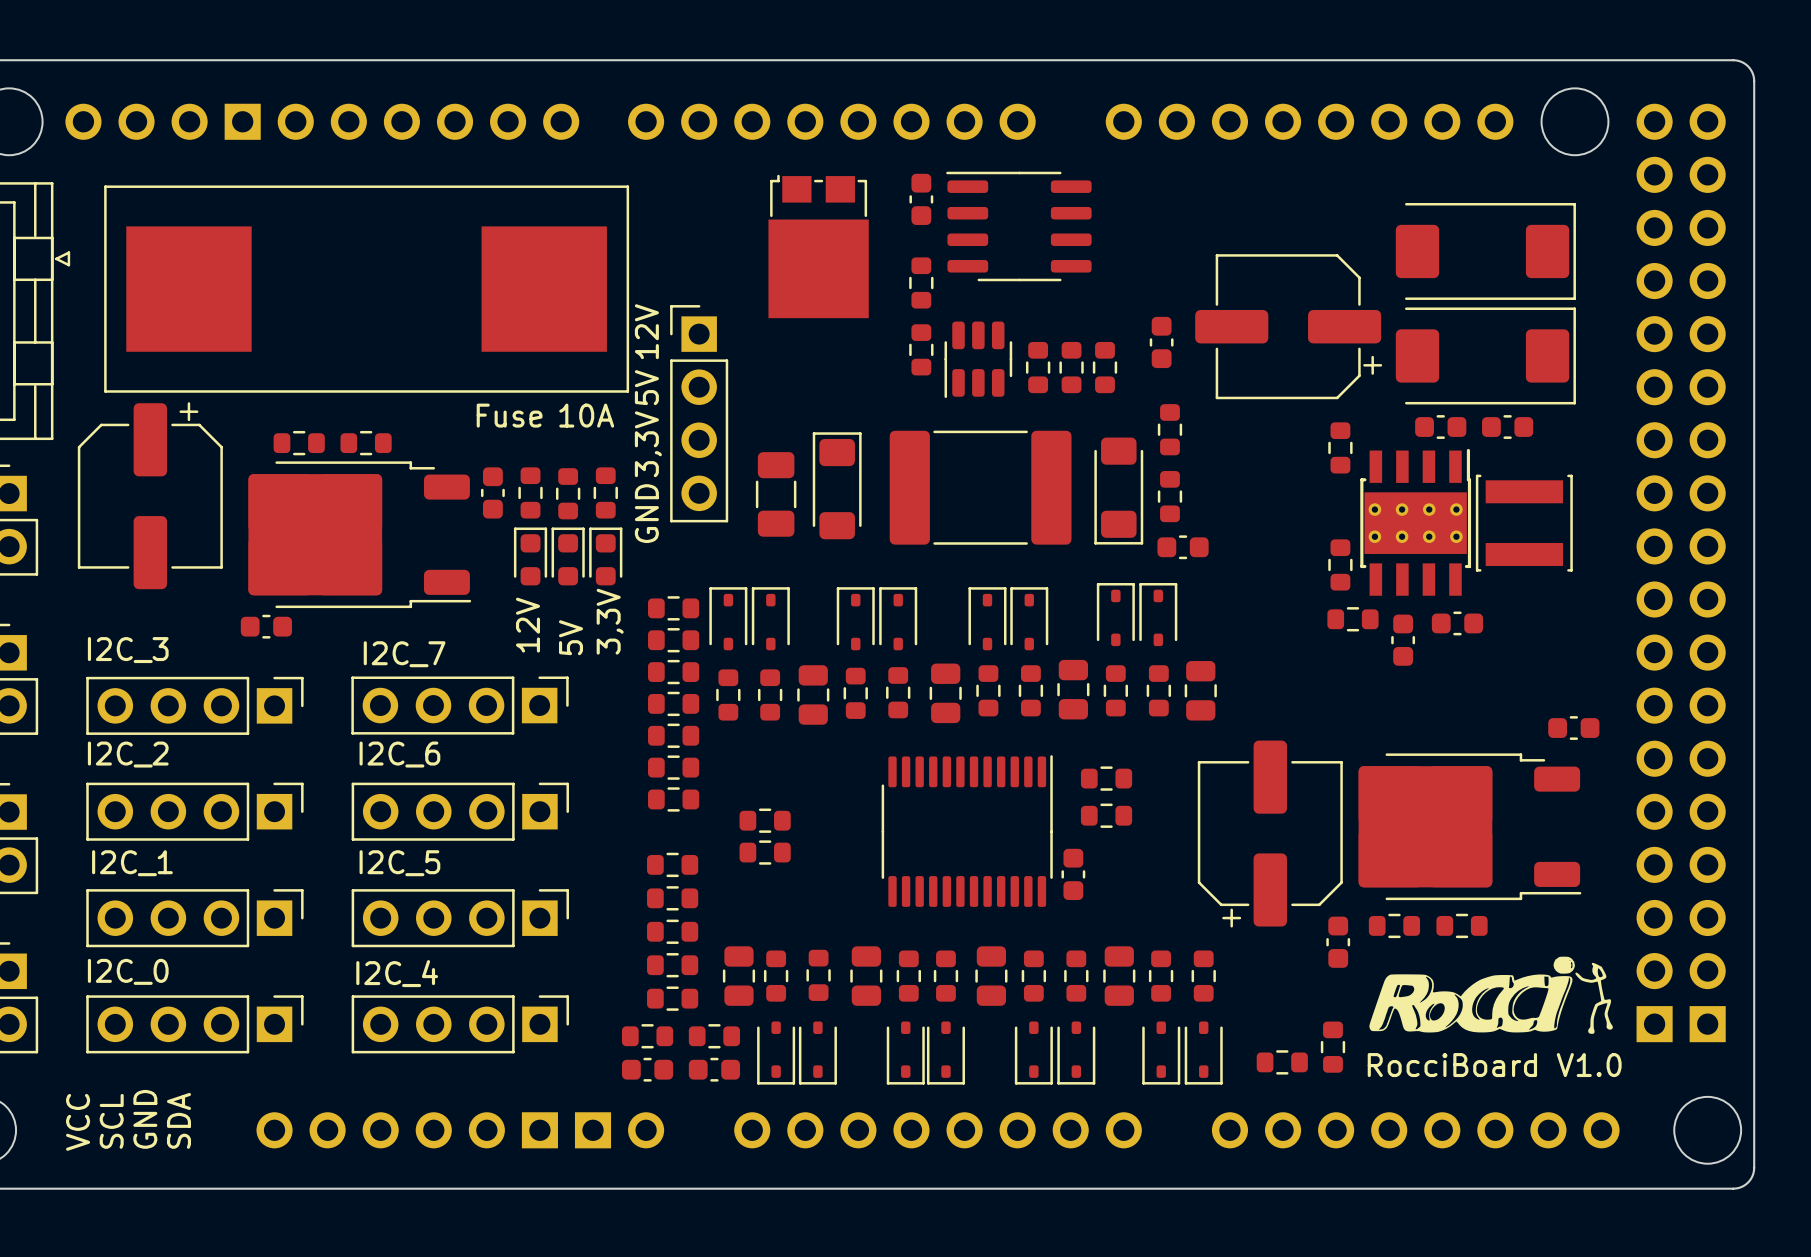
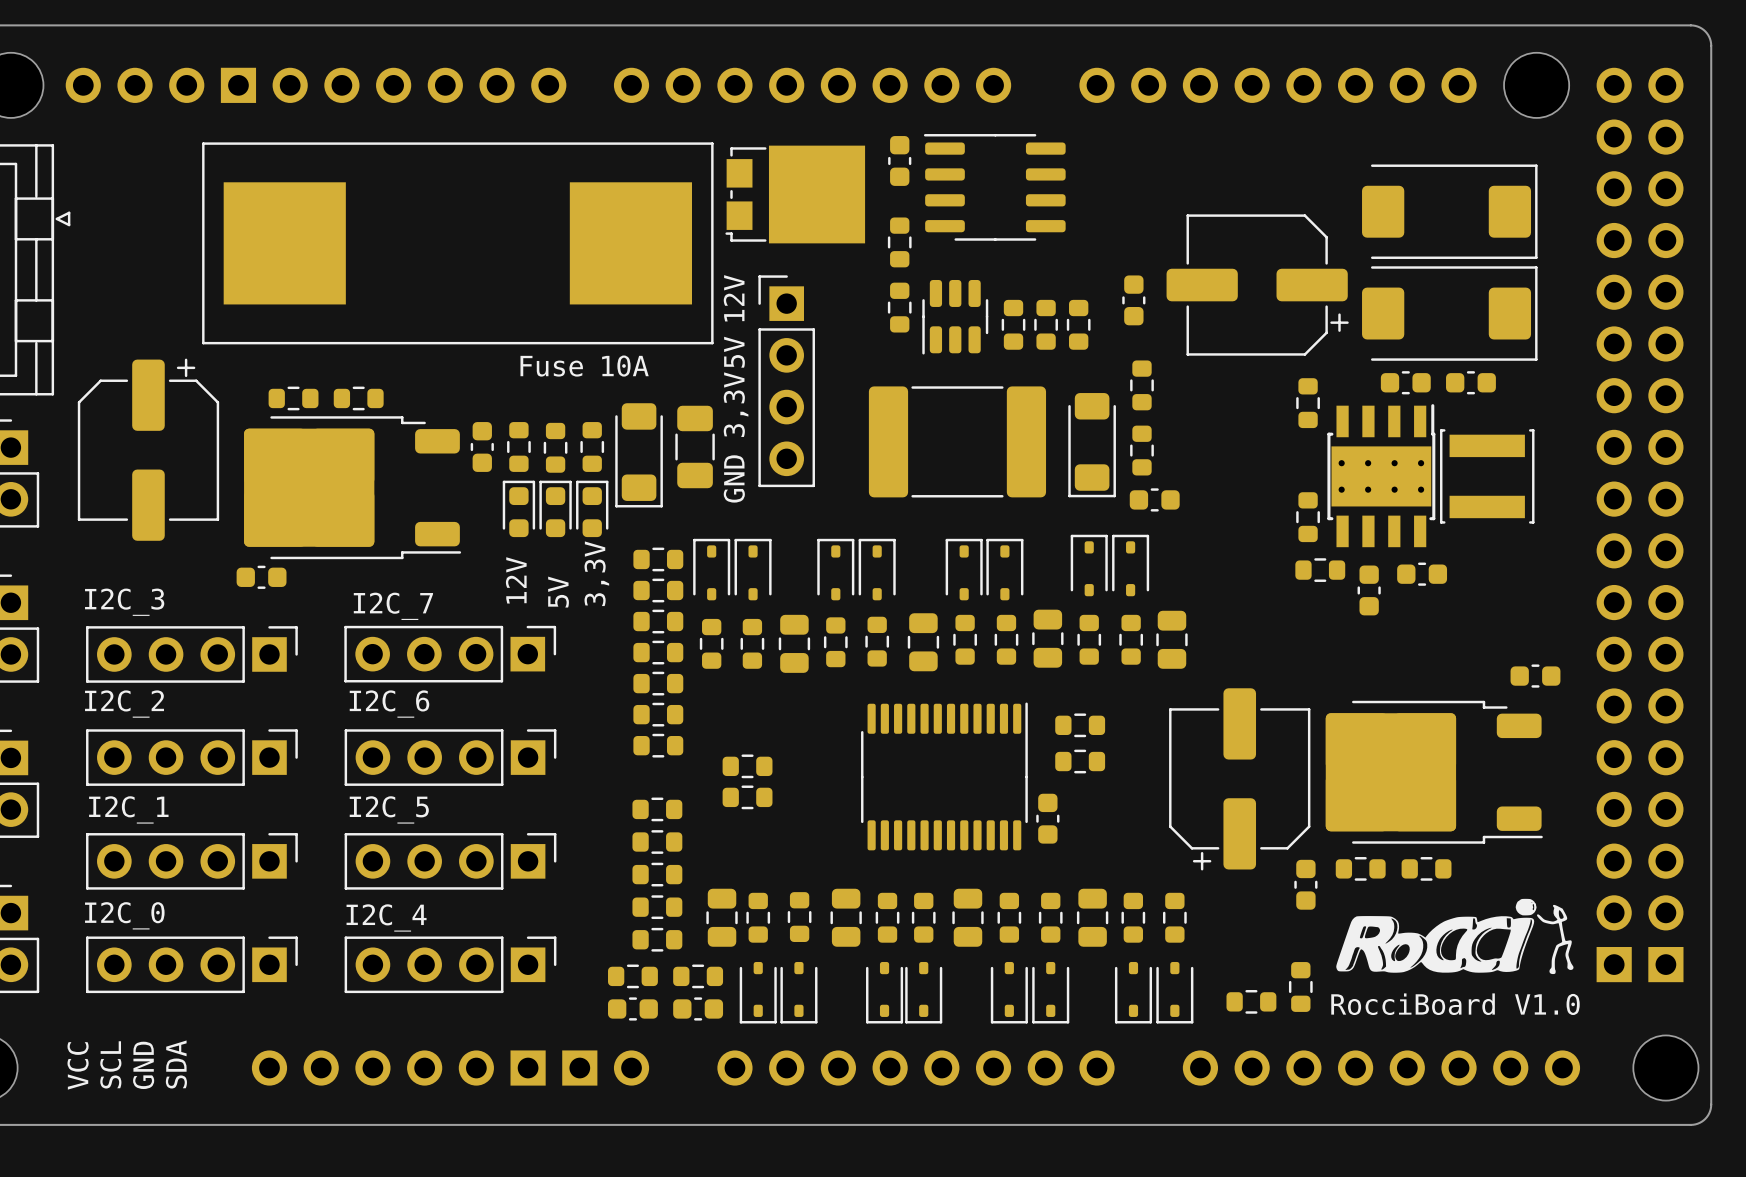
part rotation: 0° (818, 246) -> 90° counterclockwise (795, 194)
part position: (366, 289) -> (457, 243)
text position: 12V (646, 331) -> 12V (734, 298)
text position: 5V (646, 387) -> 5V (734, 352)
part position: (699, 413) -> (786, 381)
text position: Fuse (509, 415) -> Fuse (551, 366)
text position: 10A (586, 415) -> 10A (625, 366)
text position: 3,3V (648, 444) -> 3,3V (736, 404)
part rotation: 0° (837, 485) -> 180° (639, 455)
part position: (837, 485) -> (639, 455)
part position: (776, 494) -> (695, 446)
text position: GND (646, 513) -> GND (734, 478)

